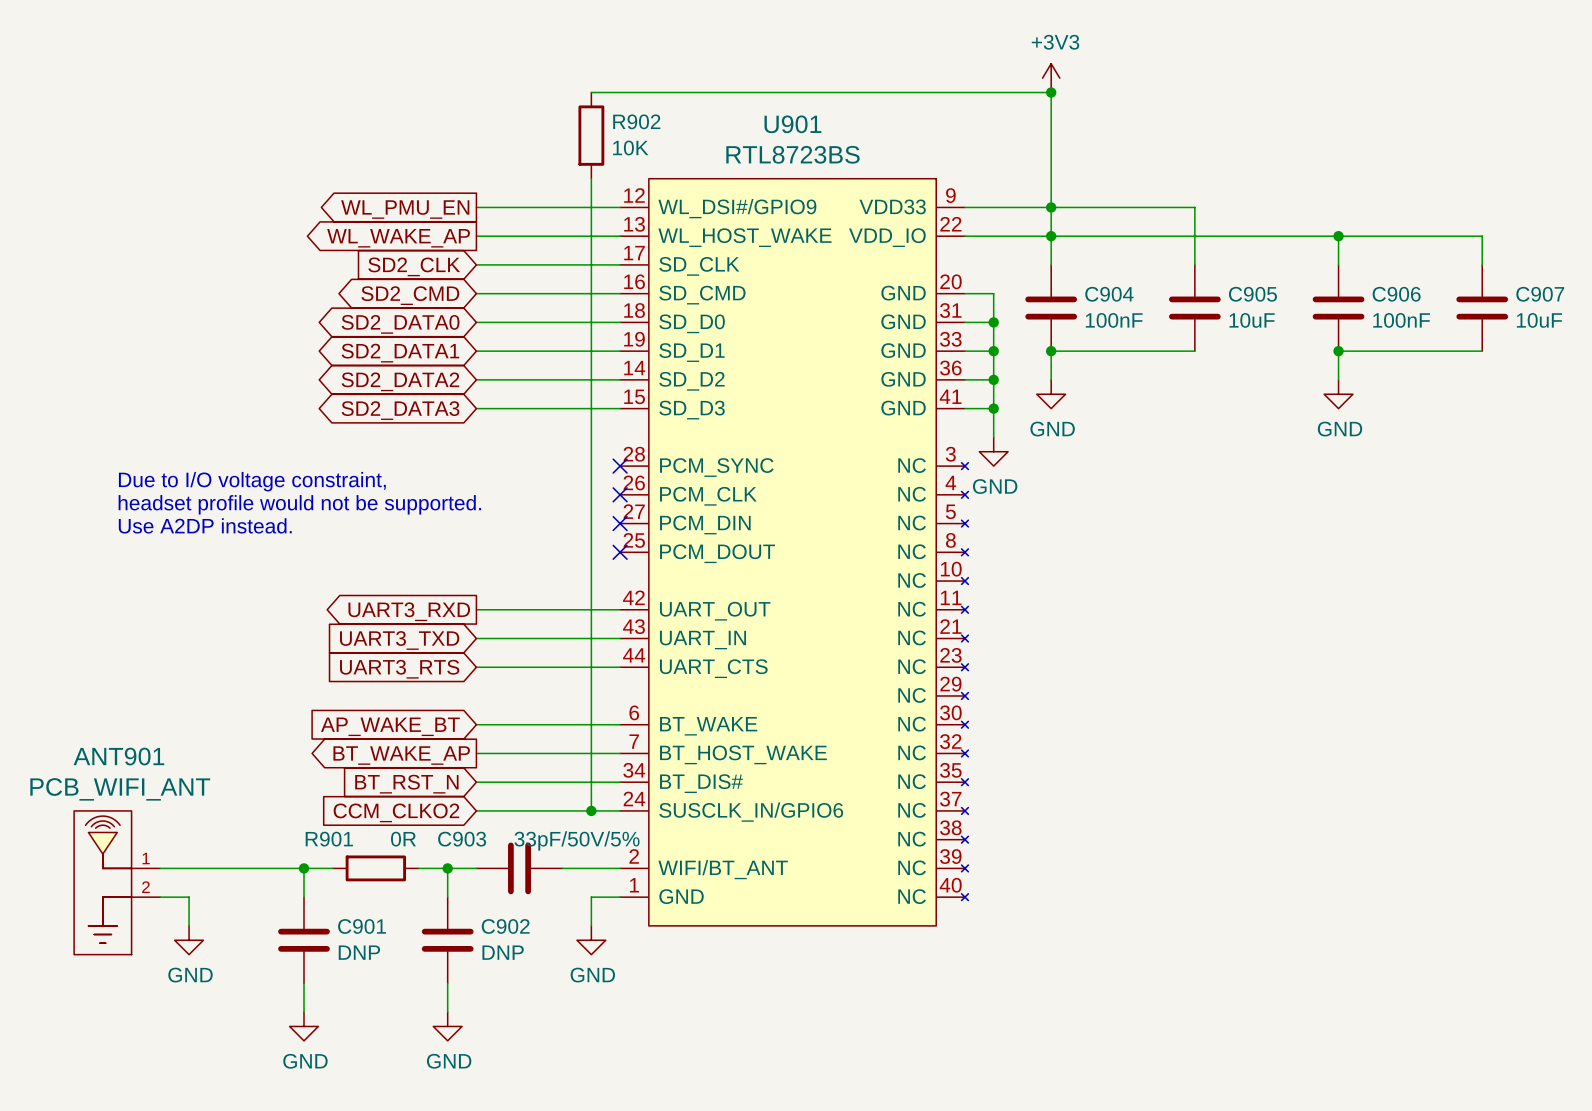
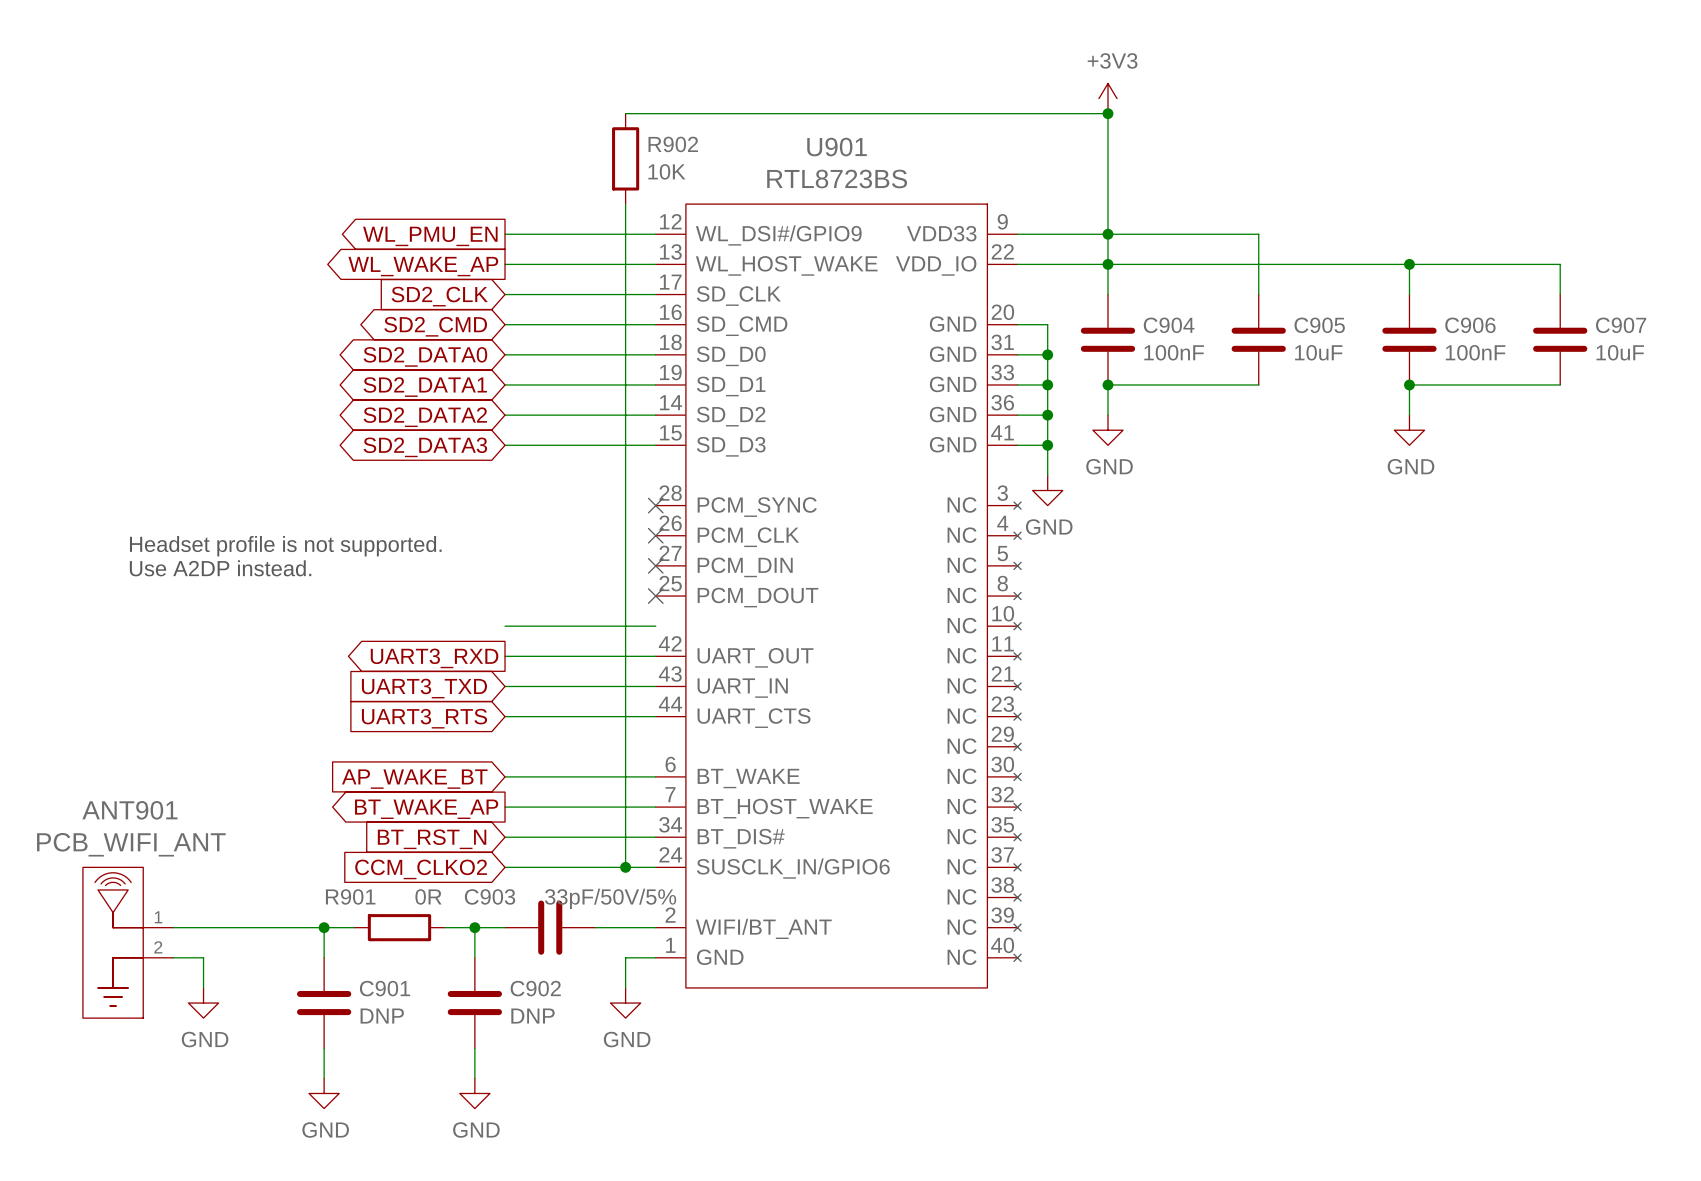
text: Due to I/O voltage constraint, (252, 481) -> none
text: headset profile would not be supported. (299, 504) -> Headset profile is not supported. (285, 546)
wire: none -> (505, 626) (655, 626)

